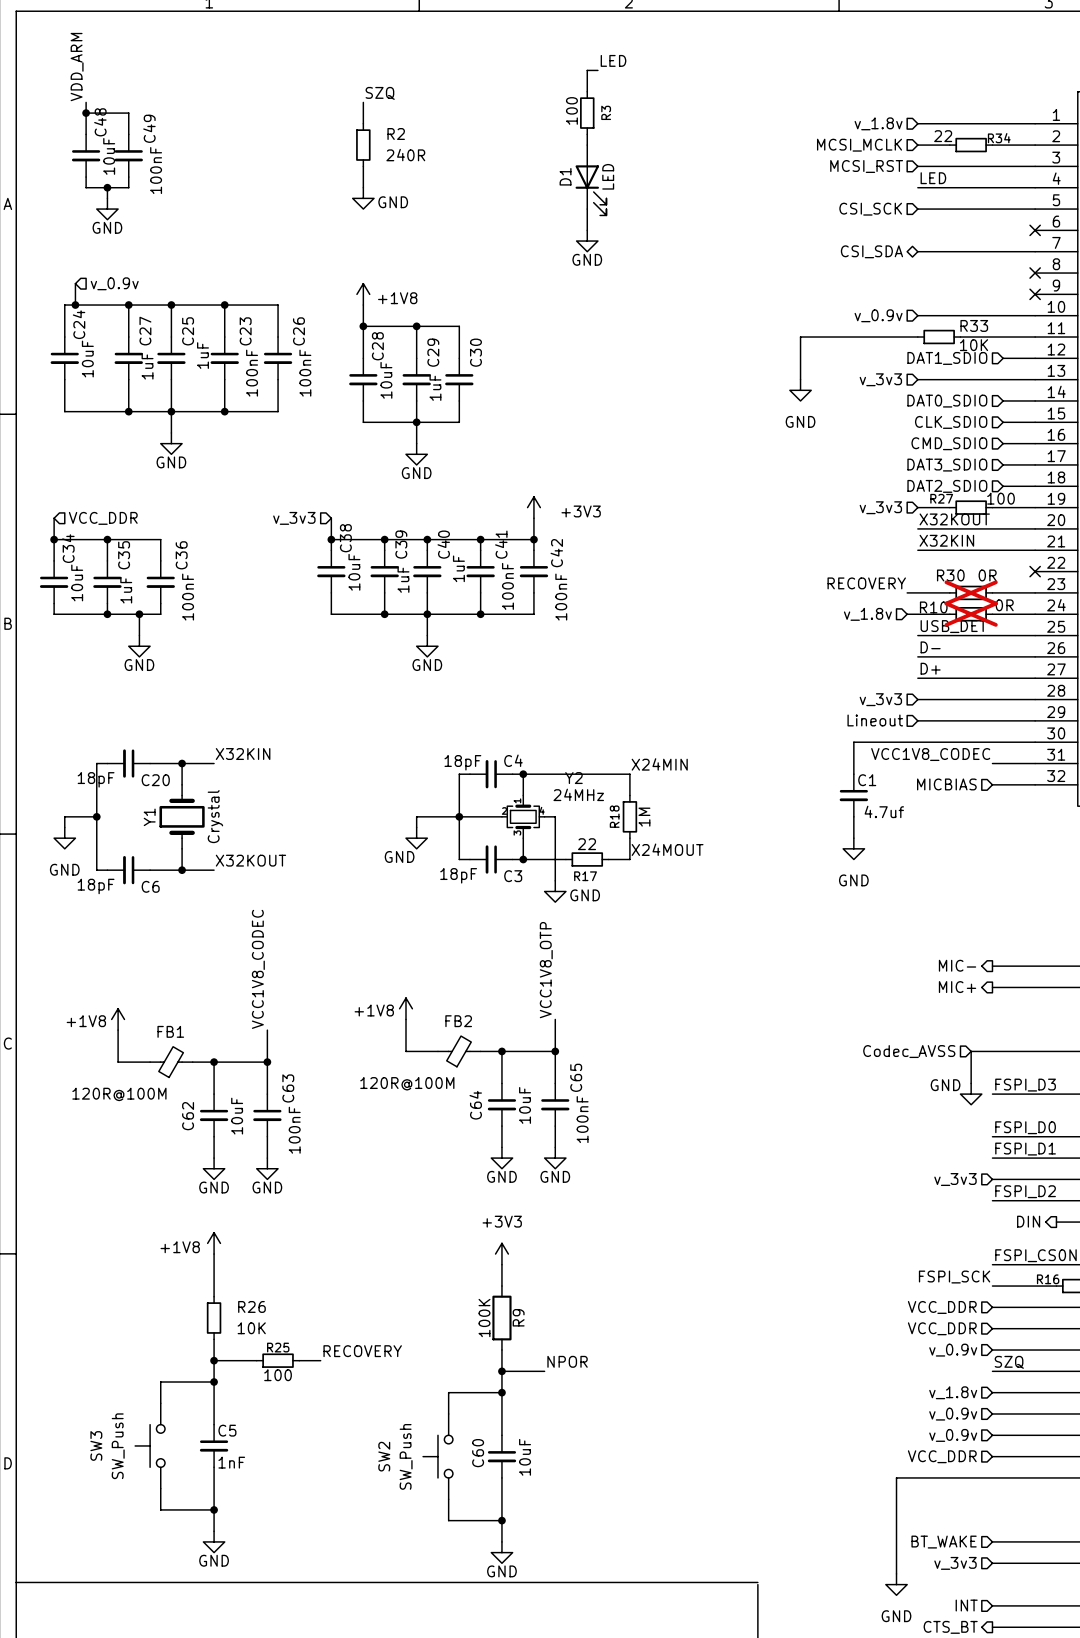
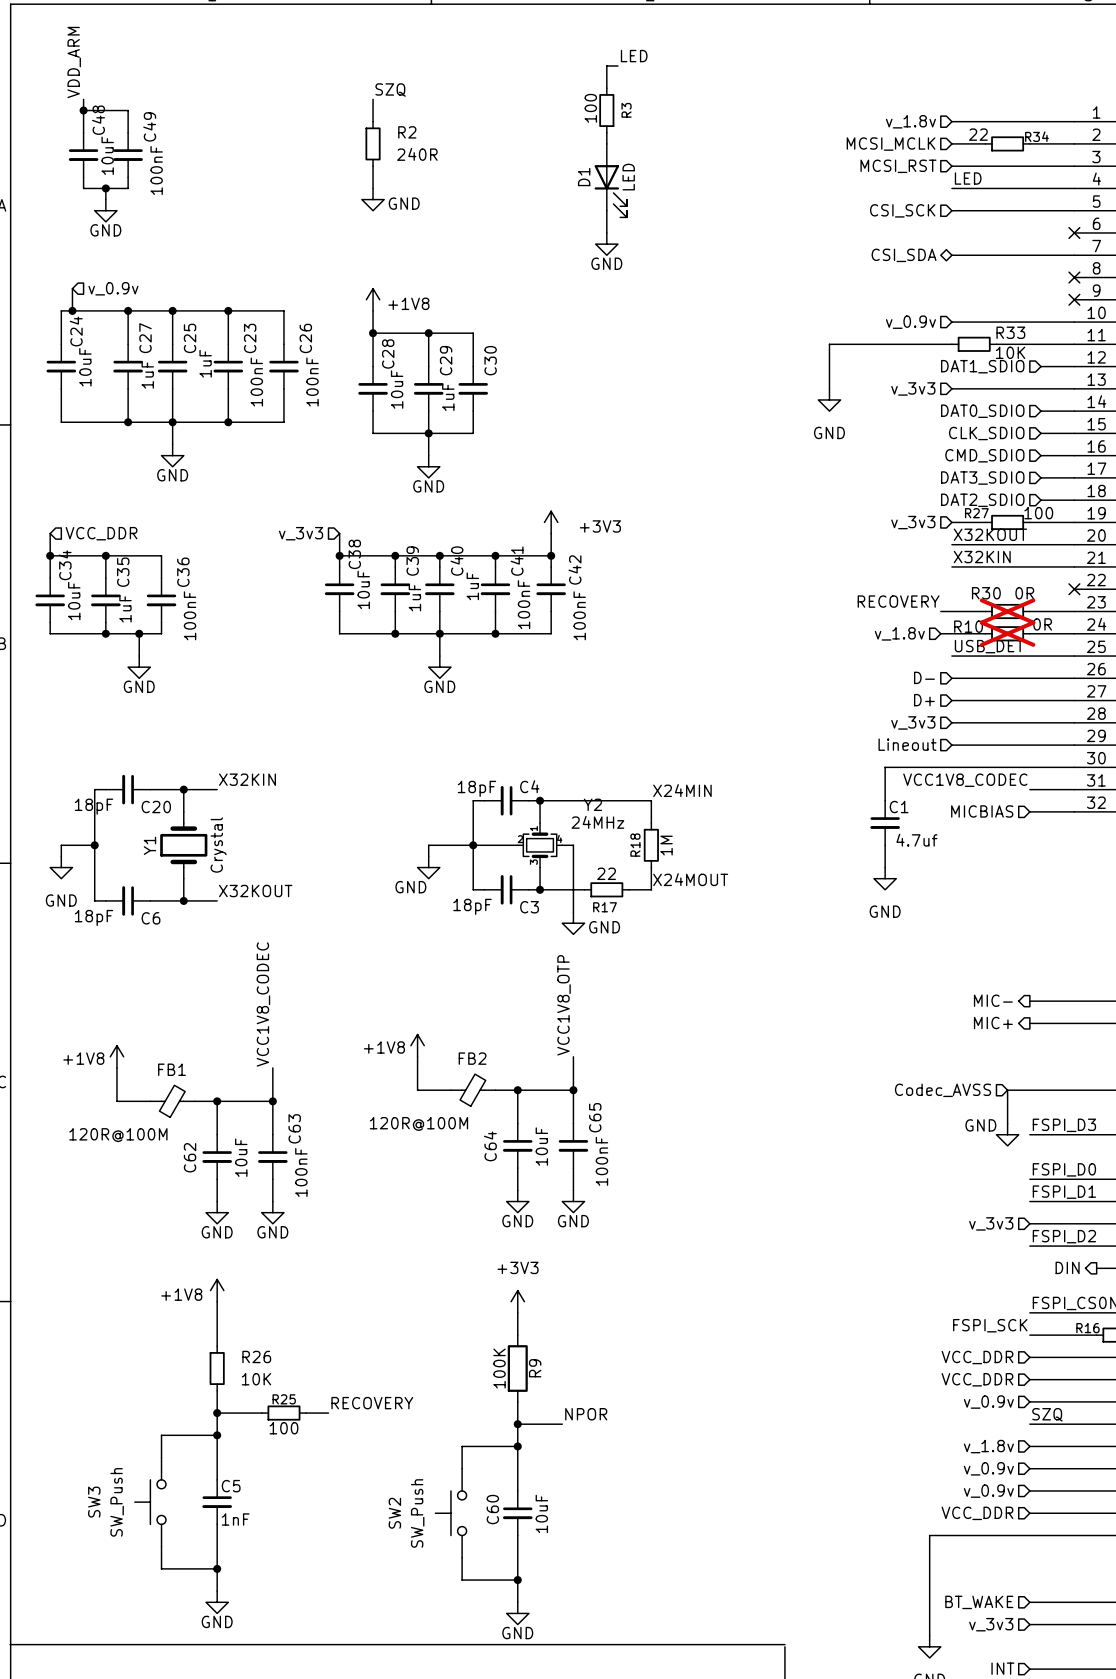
label: D- (930, 647) -> none
hierarchical label: none -> D- (924, 677)
label: D+ (930, 668) -> none
hierarchical label: none -> D+ (924, 700)

